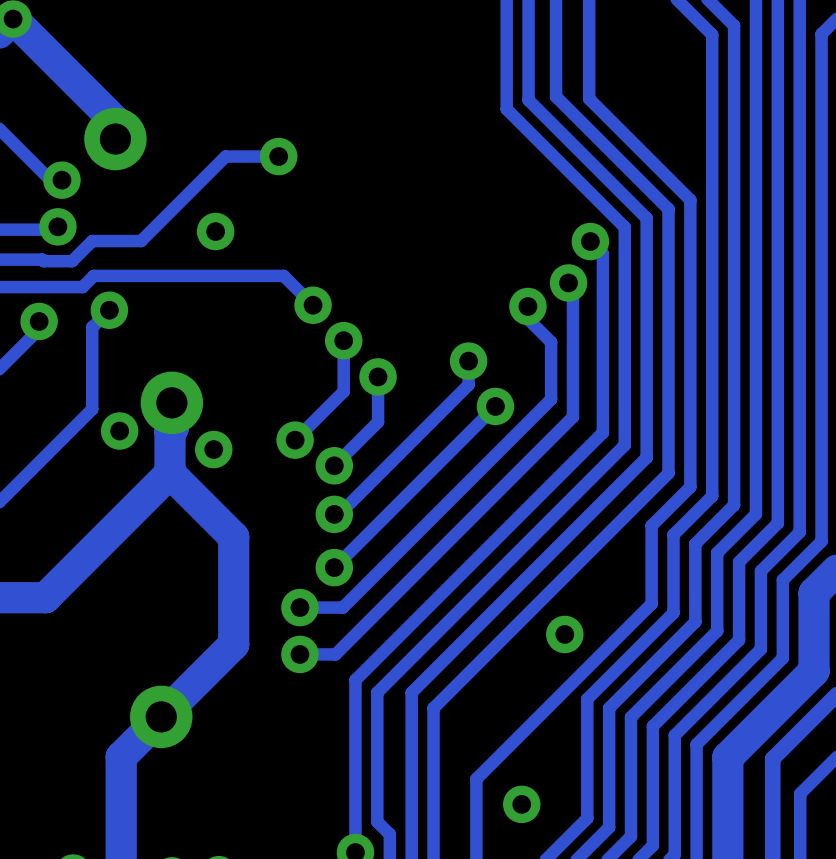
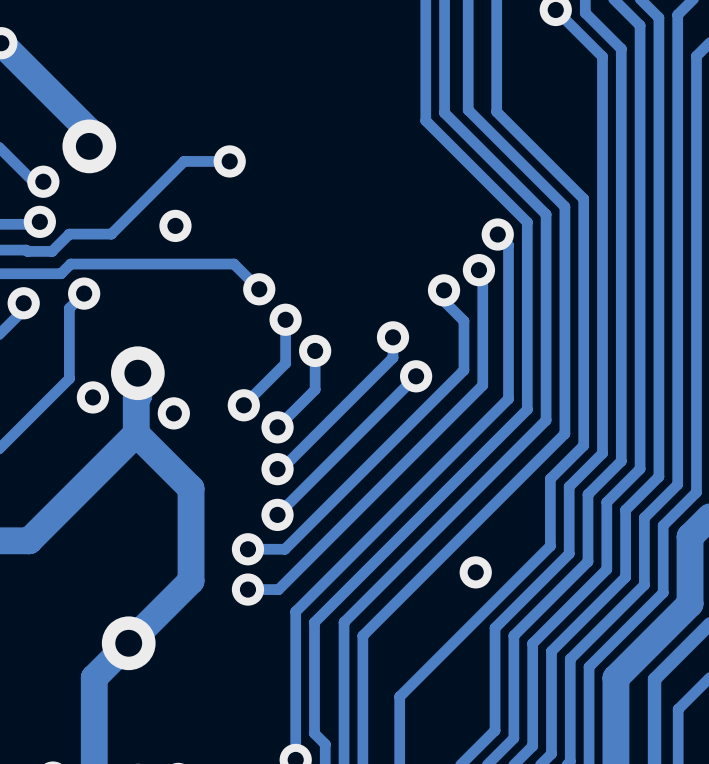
via: (521, 804) -> none

